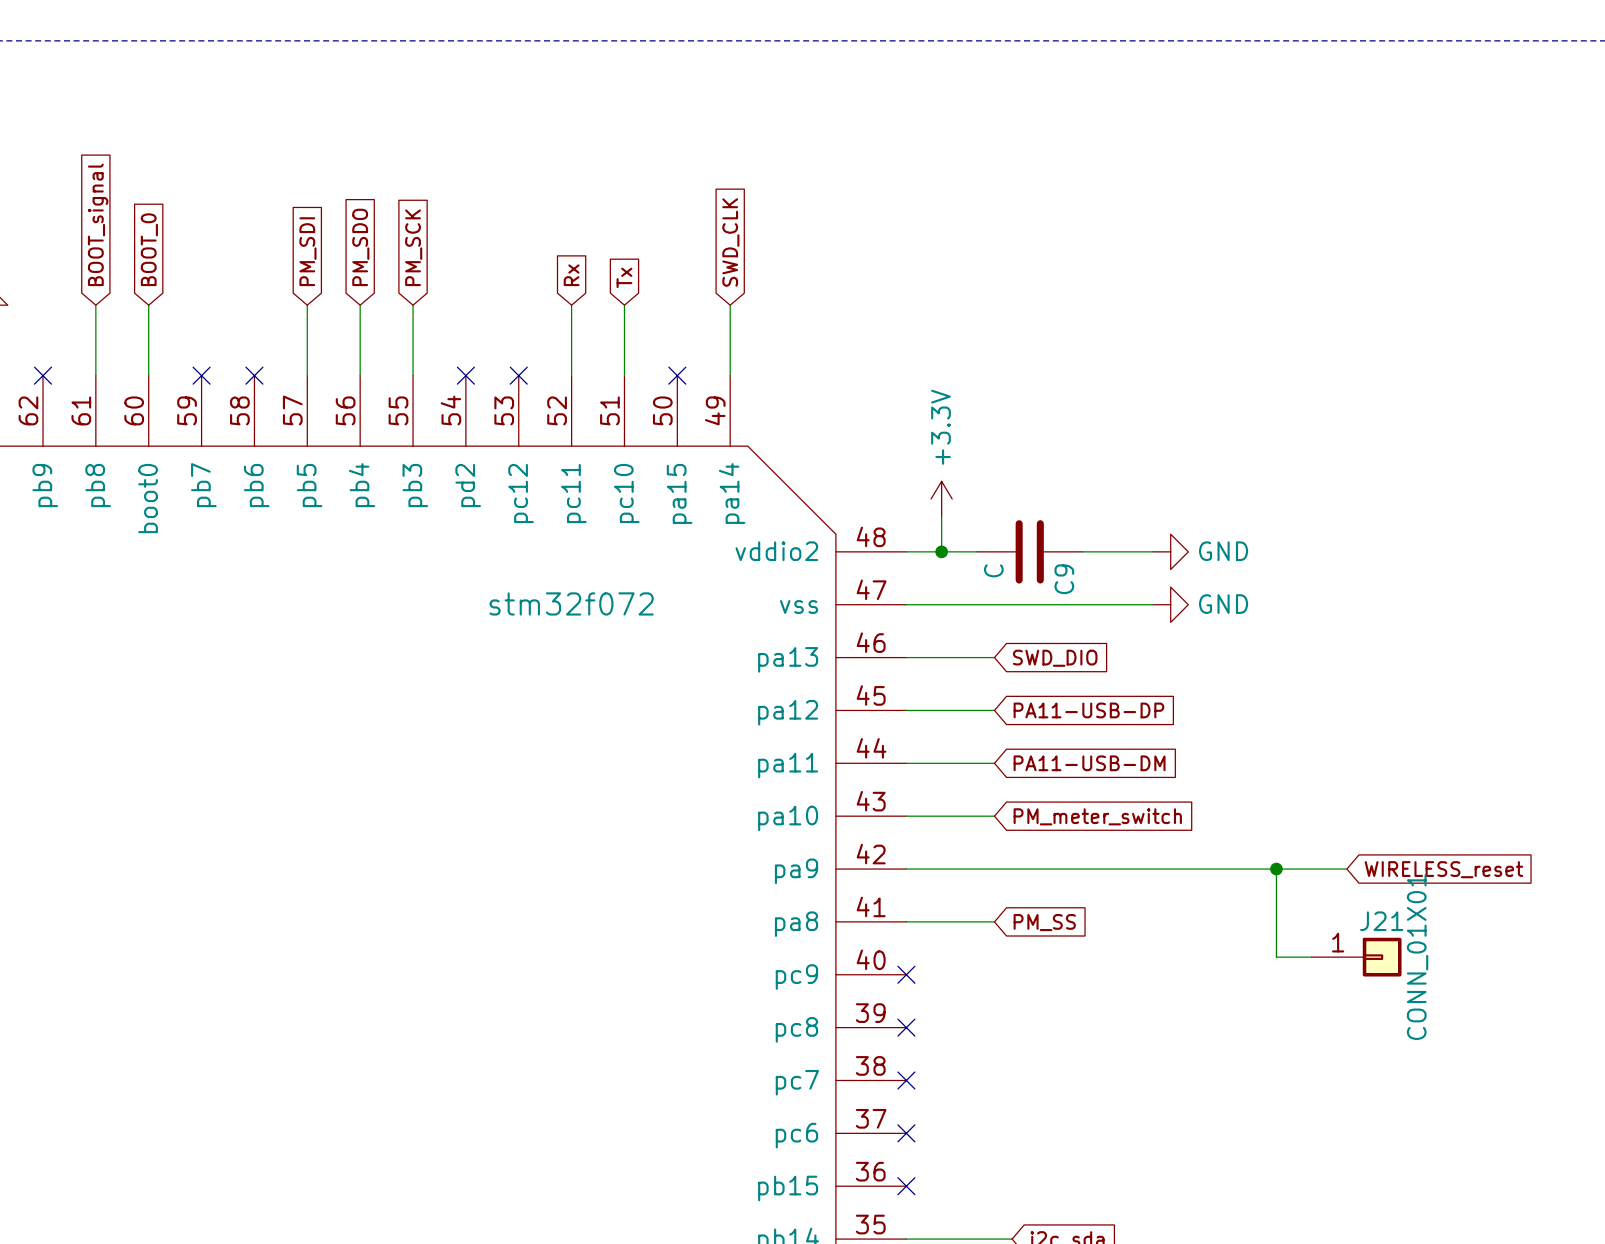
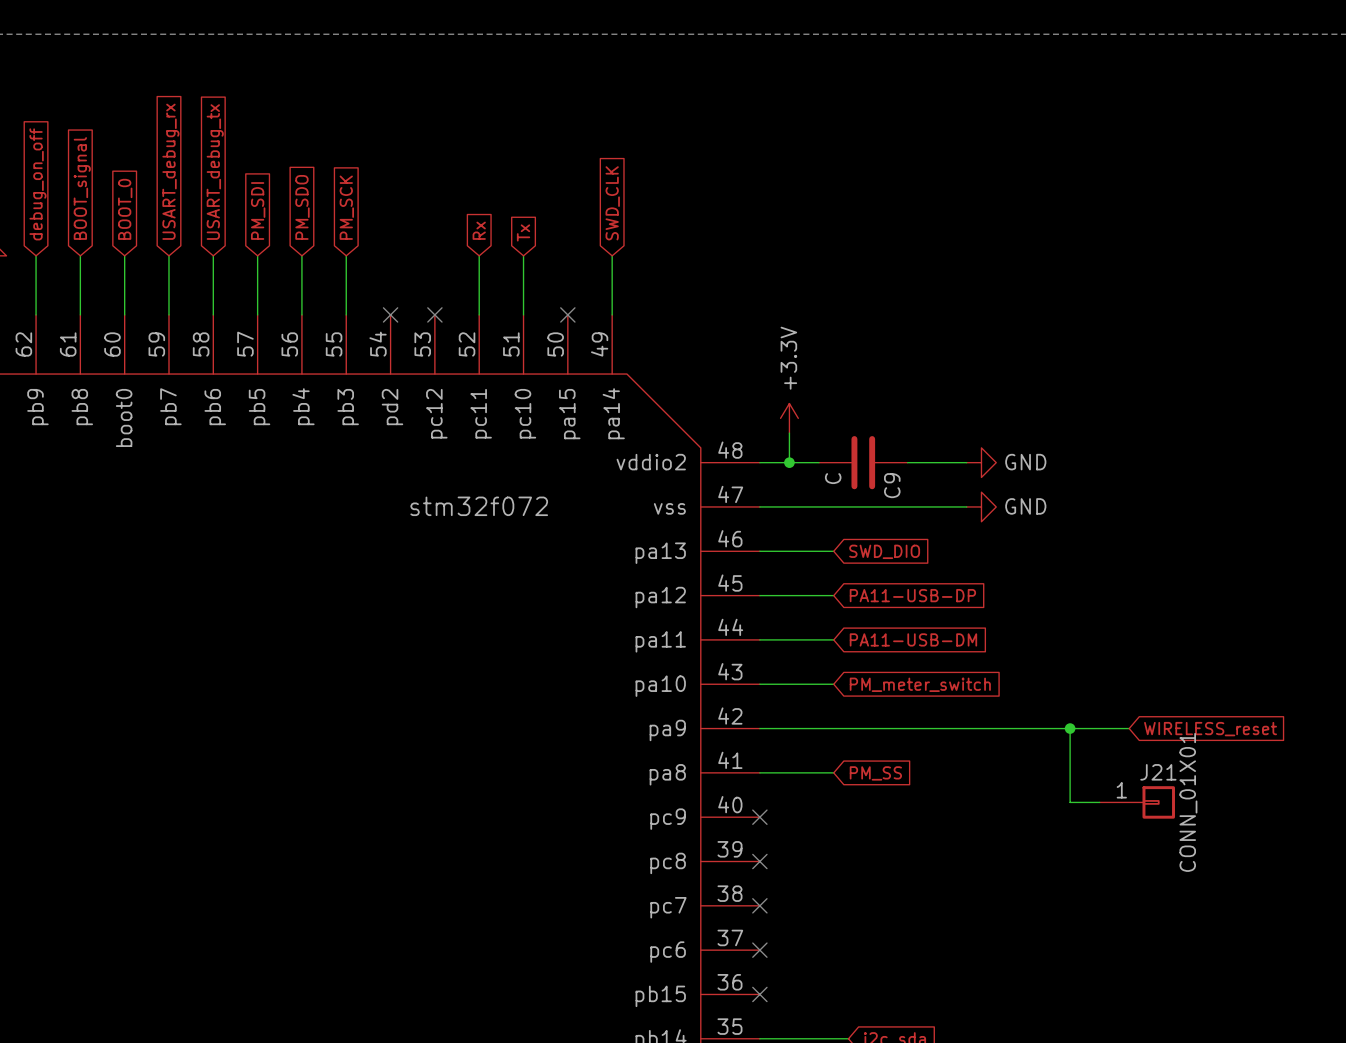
global label: none -> USART_debug_rx (170, 171)
global label: none -> USART_debug_tx (215, 172)
global label: none -> debug_on_off (37, 184)
wire: none -> (36, 255) (36, 314)
wire: none -> (168, 255) (168, 314)
wire: none -> (213, 255) (213, 314)
no-connect mark: (42, 375) -> none
no-connect mark: (201, 375) -> none
no-connect mark: (254, 375) -> none

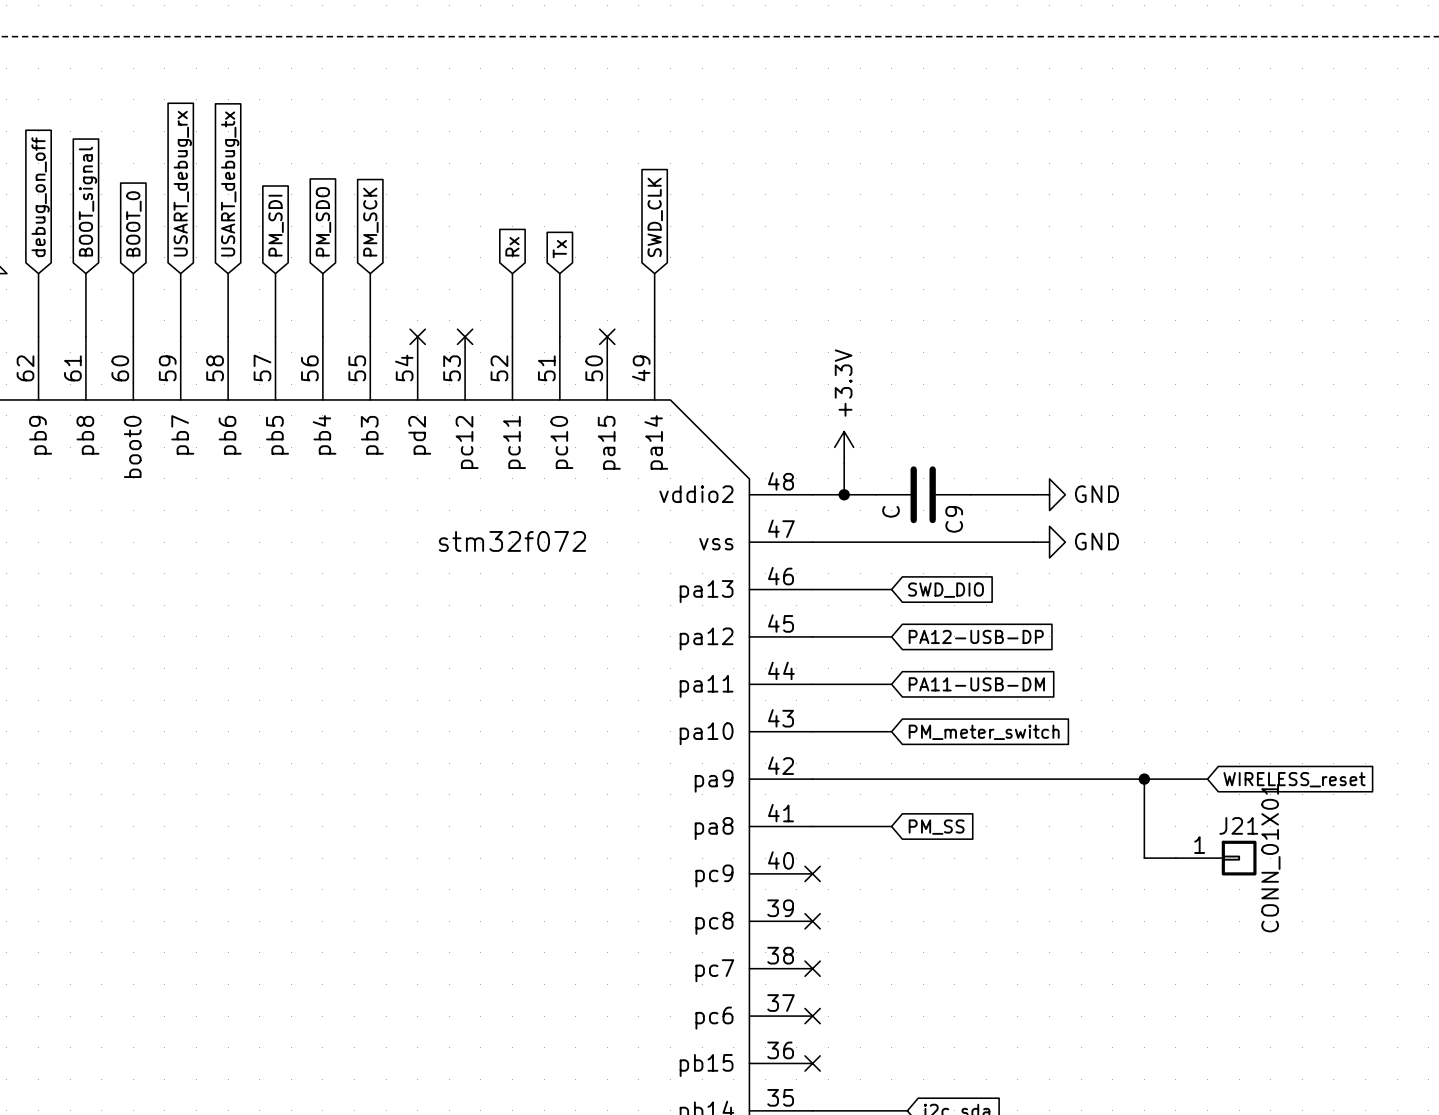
global label: PA11-USB-DP (912, 595) -> PA12-USB-DP (976, 636)

